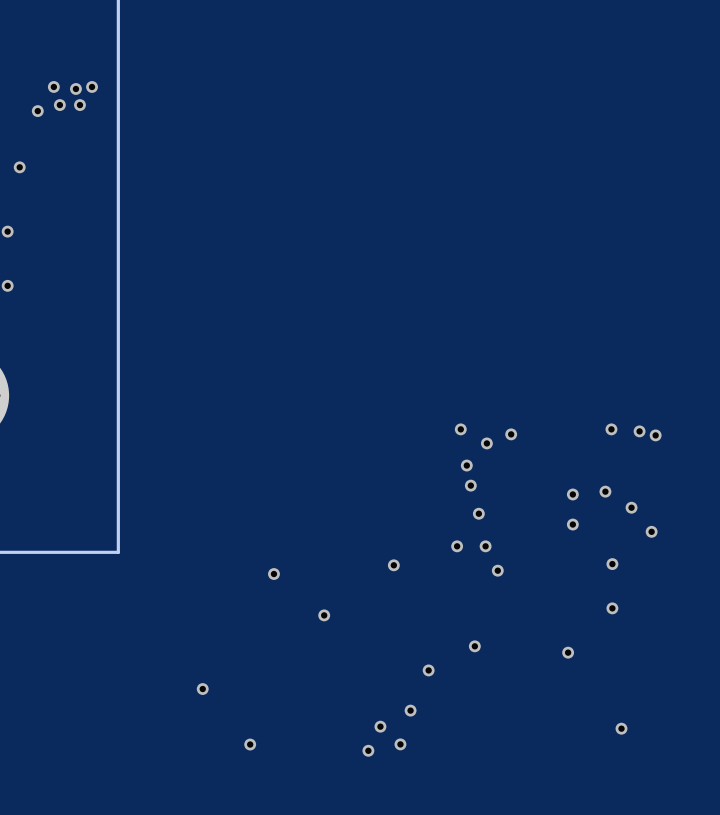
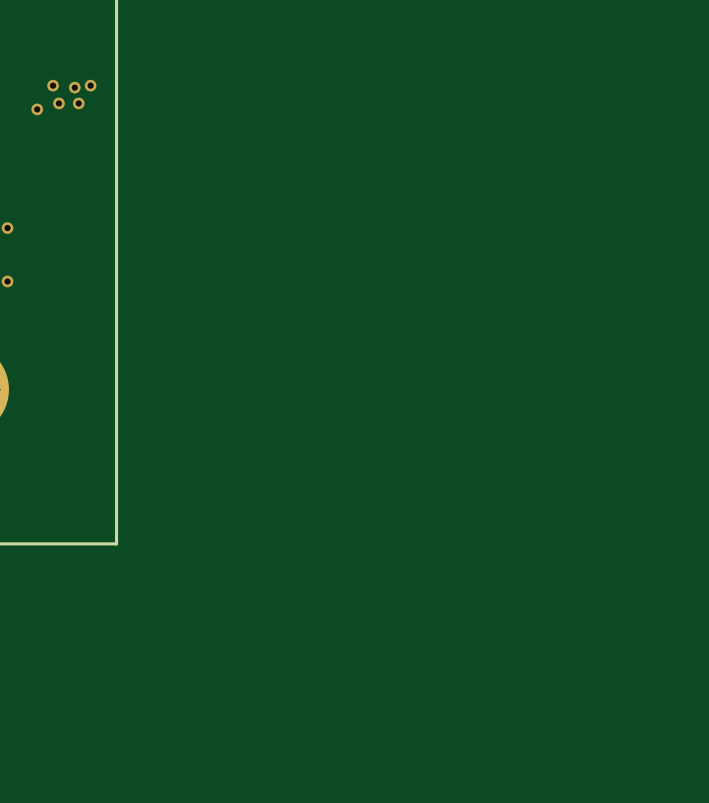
via: (19, 167) -> none
via: (460, 429) -> none
via: (611, 429) -> none
via: (639, 431) -> none
via: (511, 434) -> none
via: (655, 435) -> none
via: (486, 443) -> none
via: (466, 465) -> none
via: (470, 485) -> none
via: (605, 491) -> none
via: (572, 494) -> none
via: (631, 507) -> none
via: (478, 513) -> none
via: (572, 524) -> none
via: (651, 531) -> none
via: (457, 546) -> none
via: (485, 546) -> none
via: (612, 564) -> none
via: (393, 565) -> none
via: (497, 570) -> none
via: (273, 574) -> none
via: (612, 608) -> none
via: (324, 615) -> none
via: (474, 646) -> none
via: (568, 652) -> none
via: (428, 670) -> none
via: (202, 689) -> none
via: (410, 710) -> none
via: (380, 726) -> none
via: (621, 728) -> none
via: (250, 744) -> none
via: (400, 744) -> none
via: (368, 750) -> none

